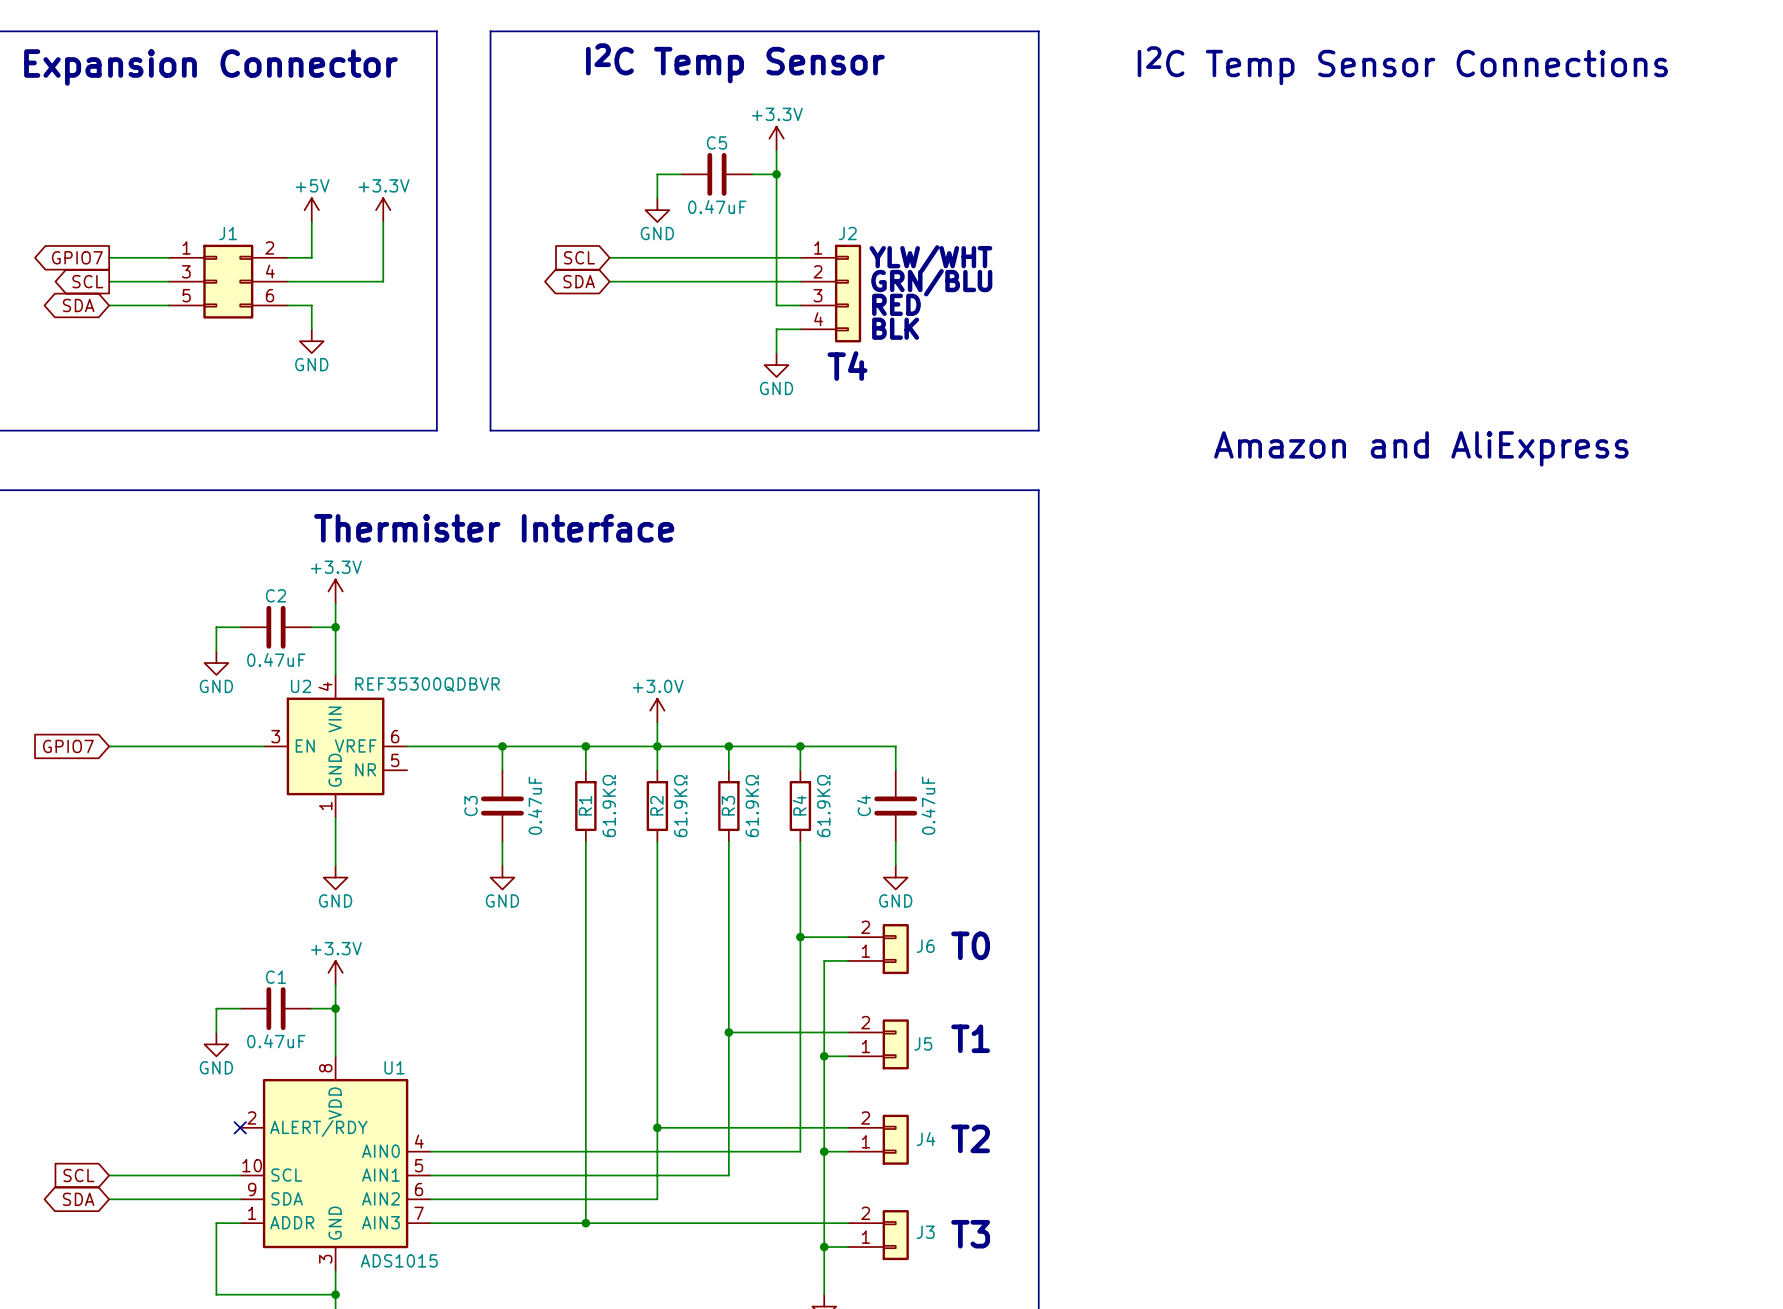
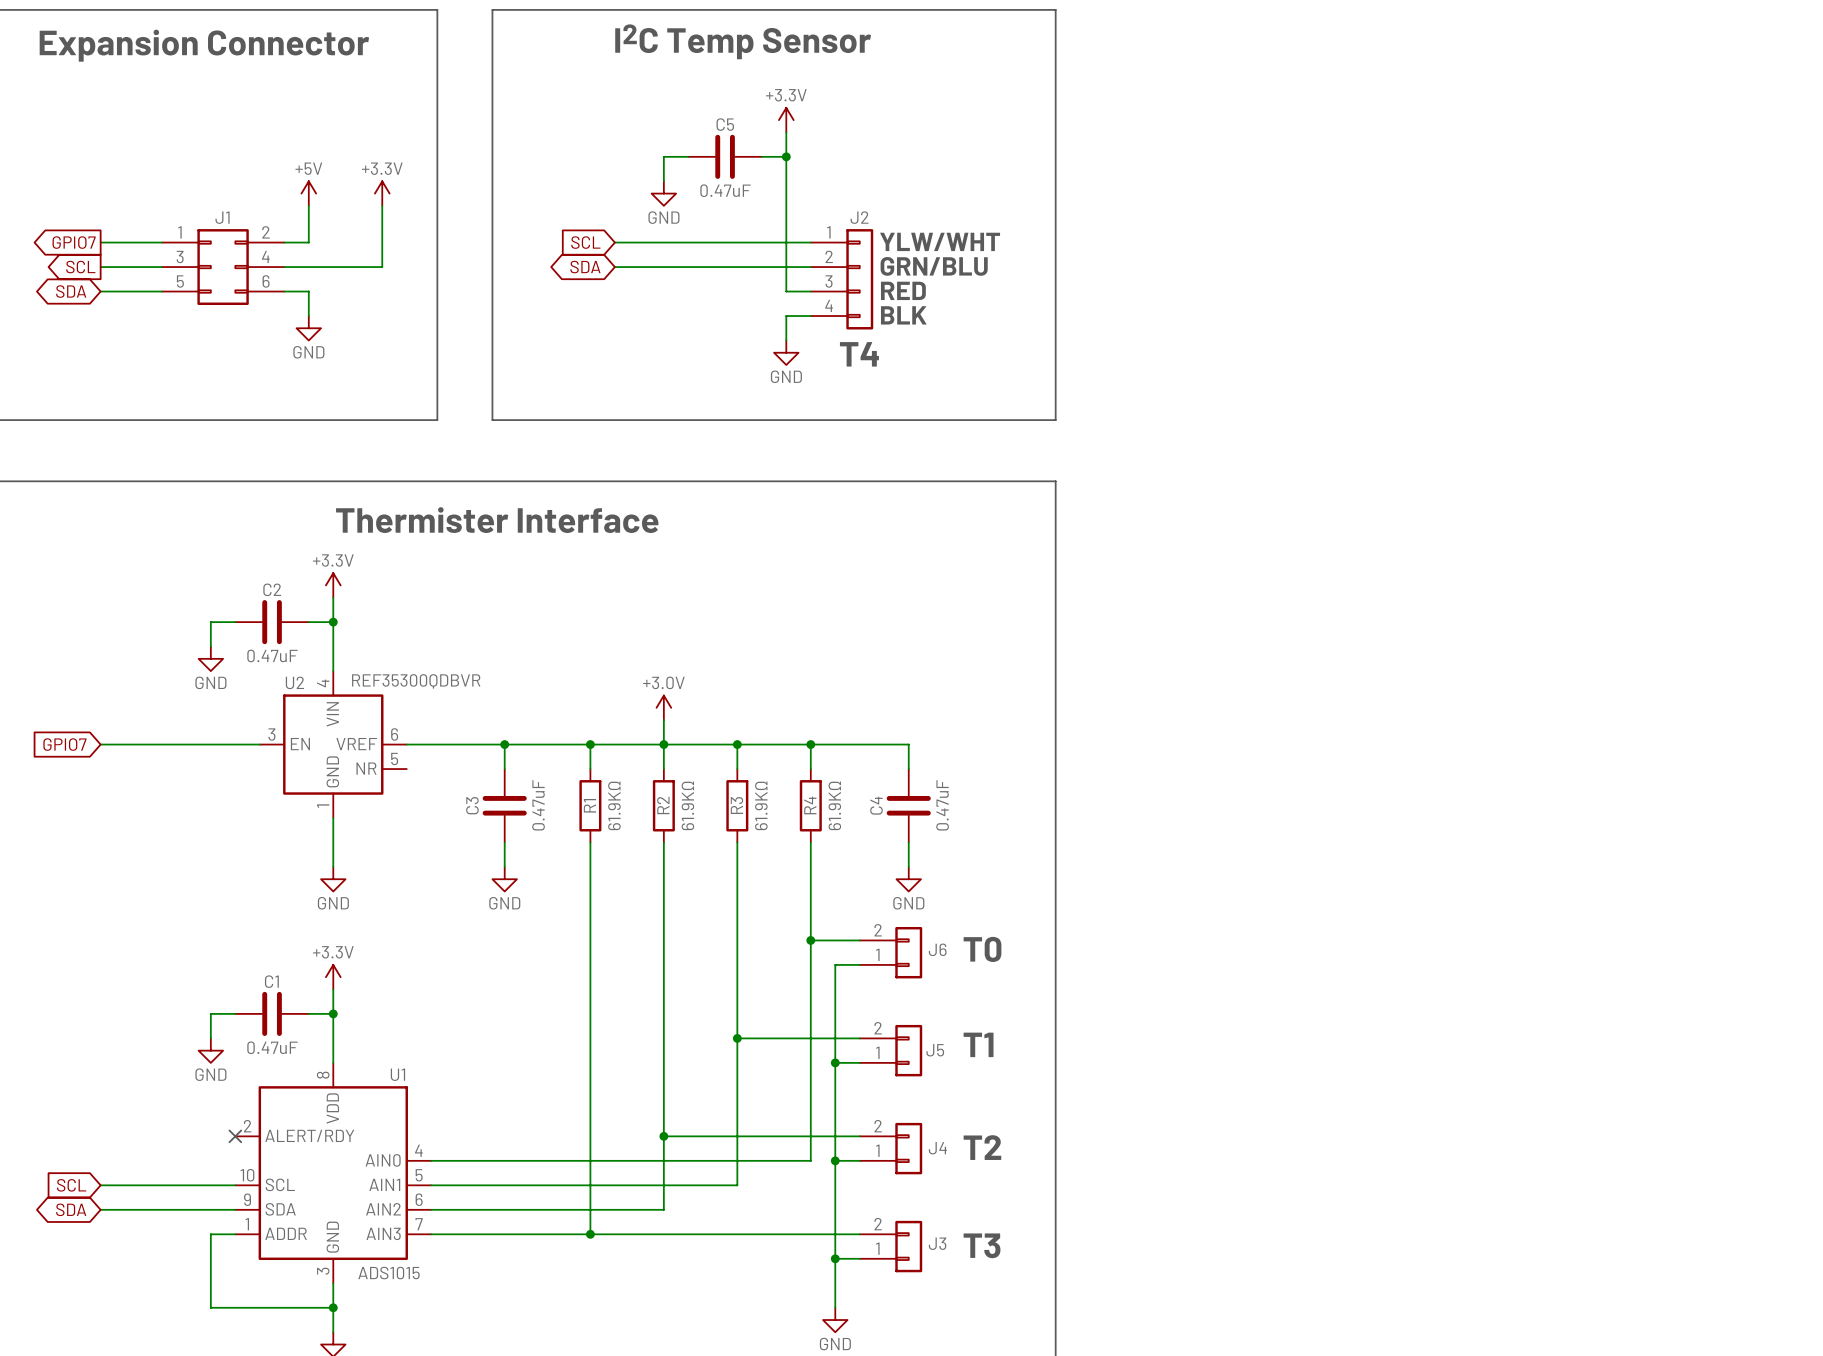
text: I2C Temp Sensor Connections (1402, 65) -> none
text: Amazon and AliExpress (1421, 448) -> none

